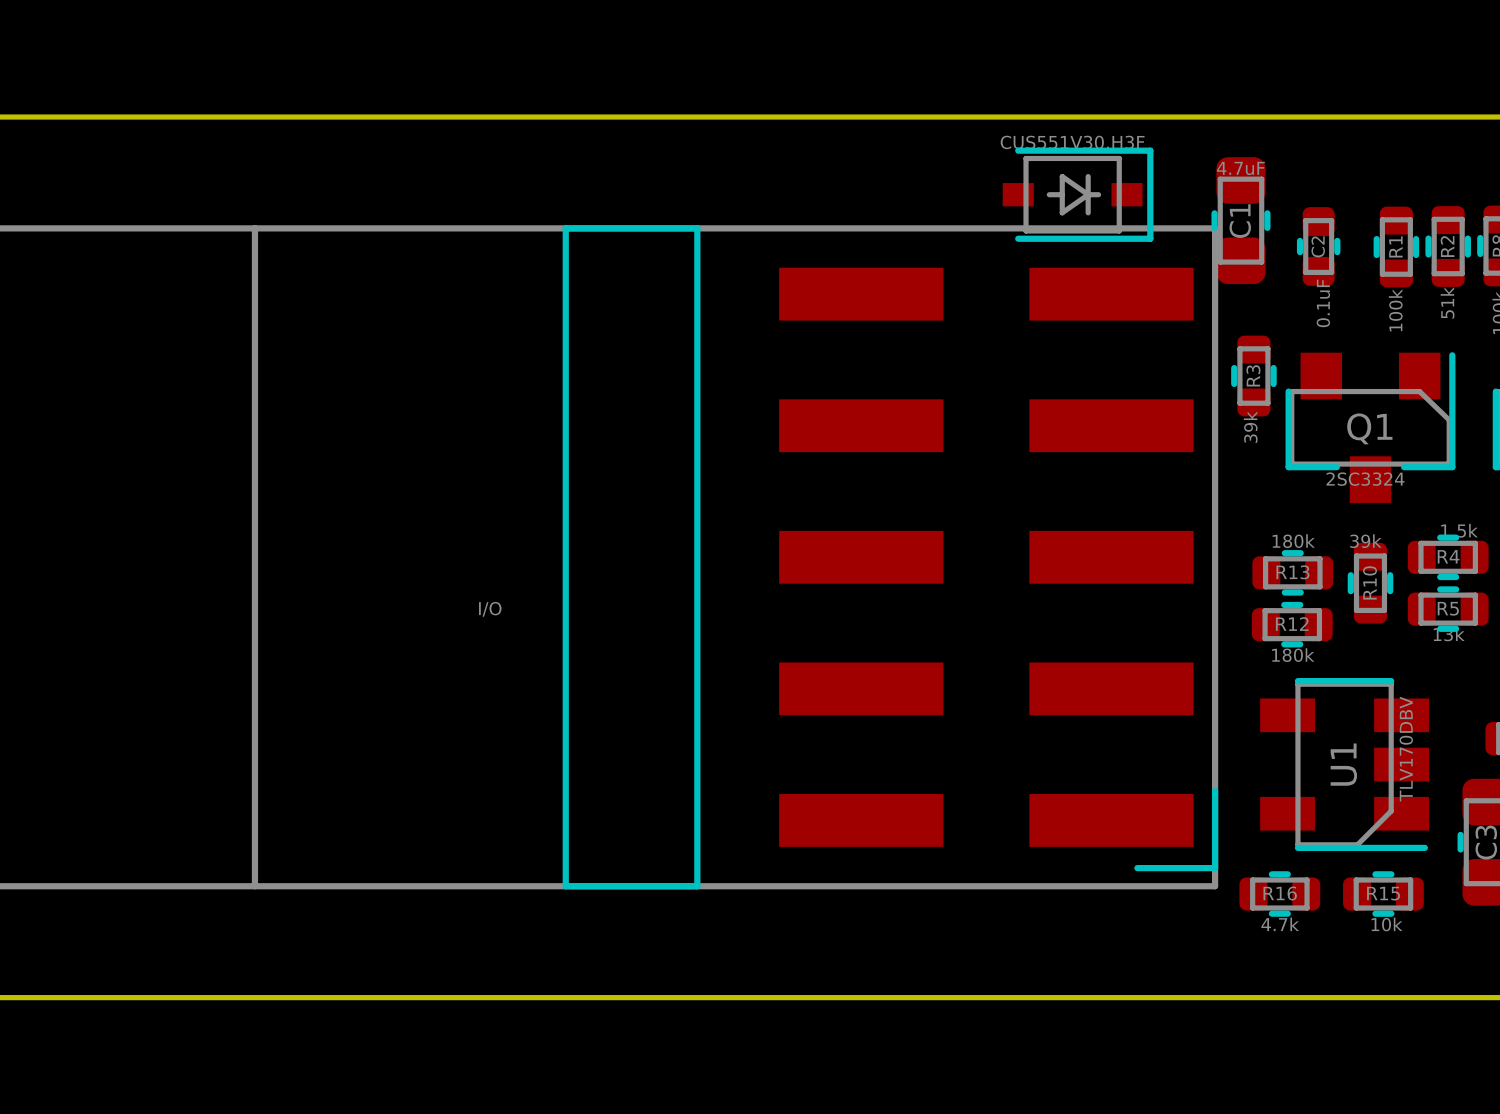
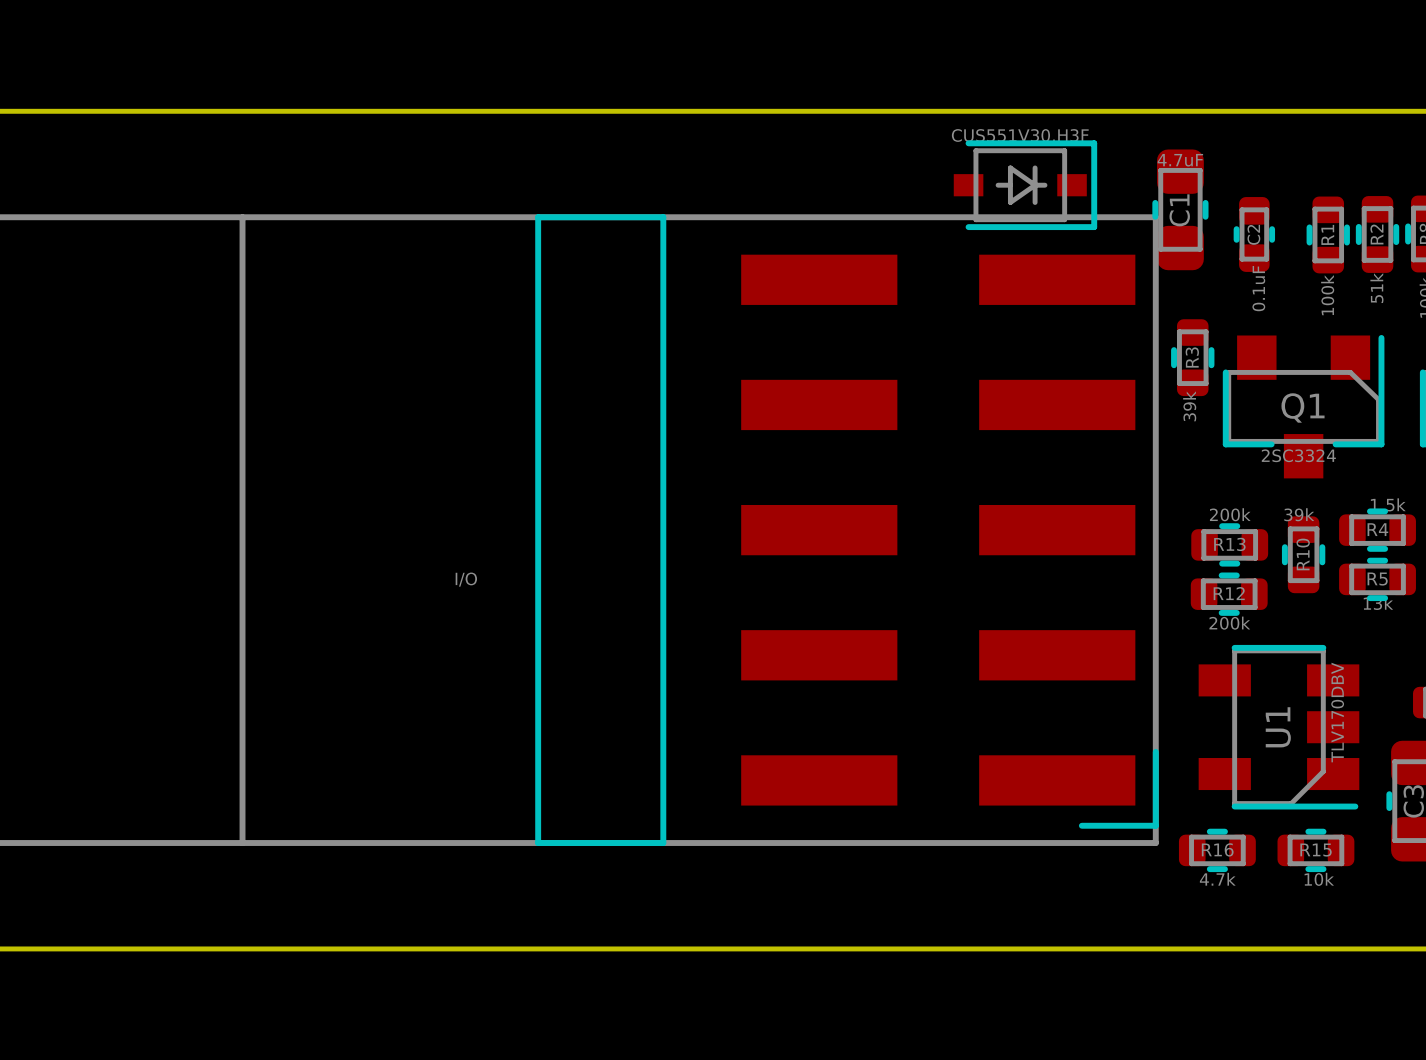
R13 value: 180k (1293, 541) -> 200k (1230, 514)
R12 value: 180k (1293, 655) -> 200k (1229, 623)

